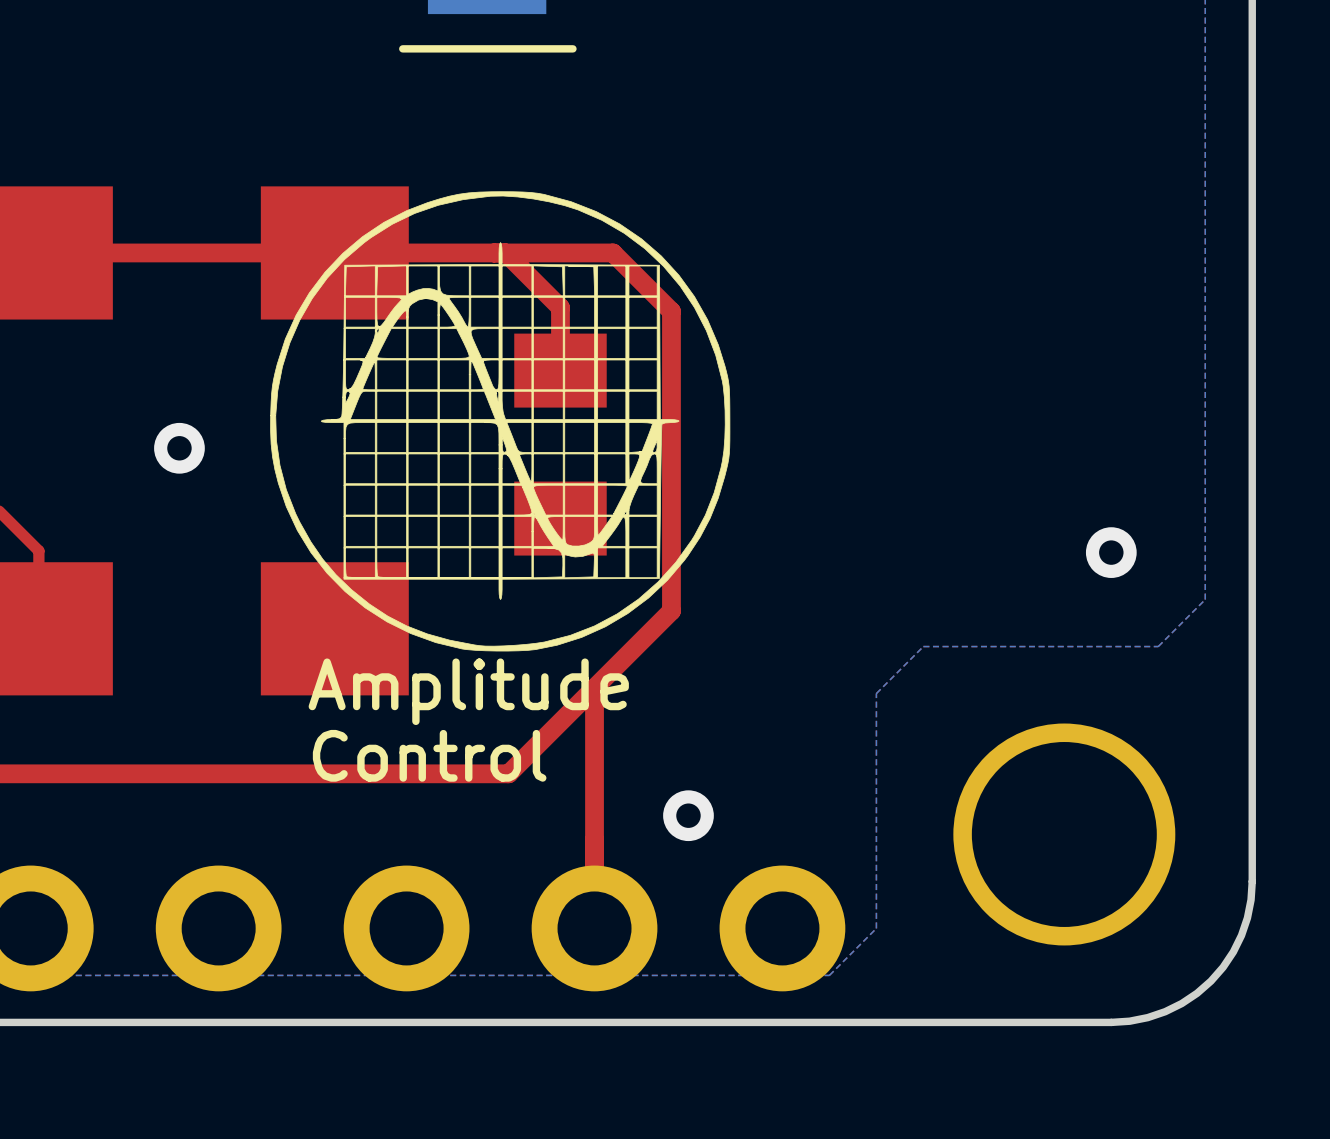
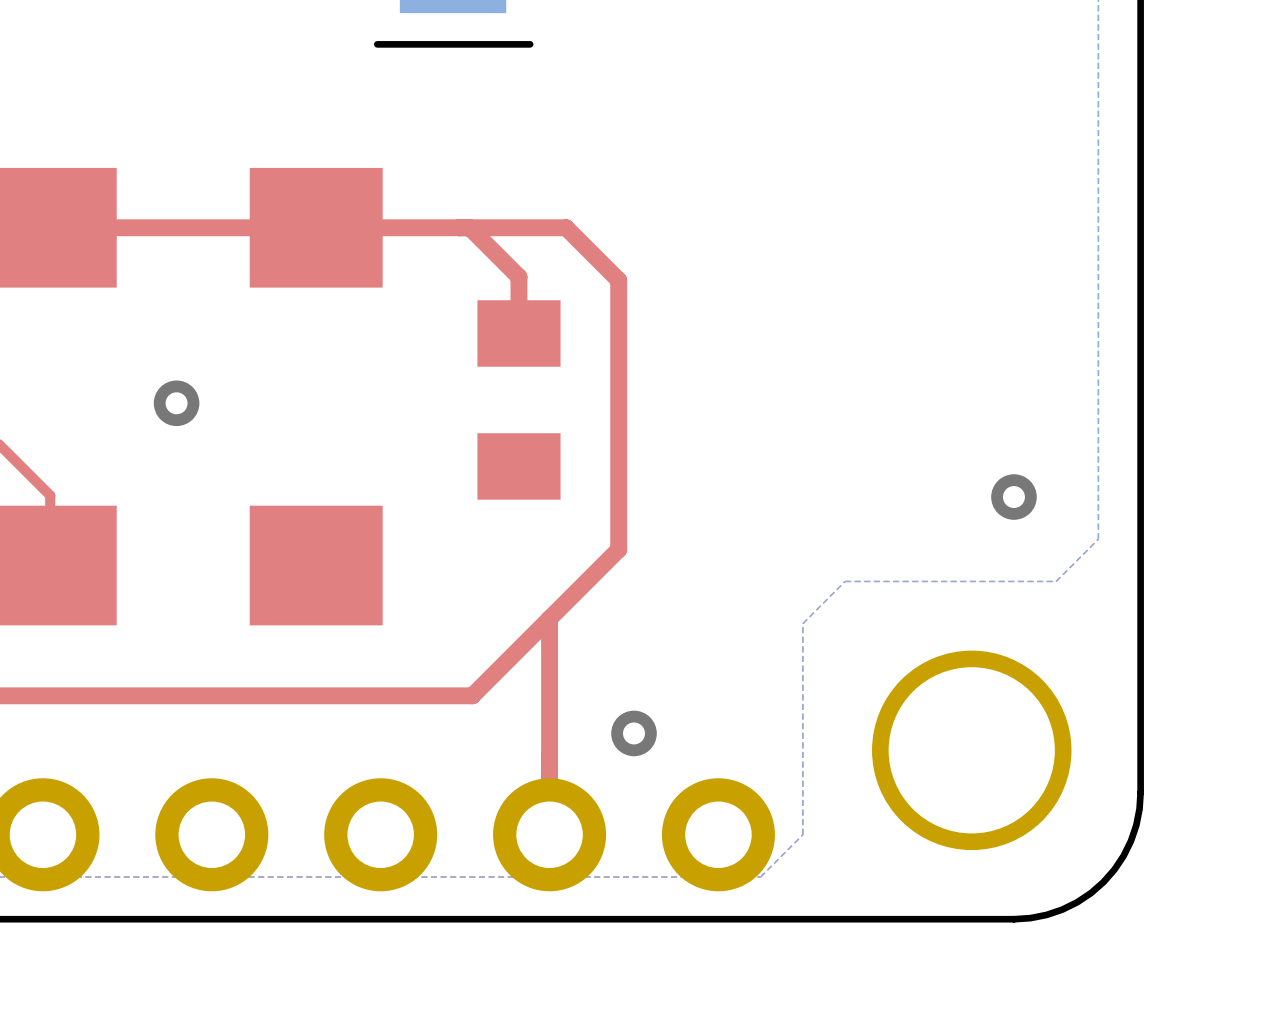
drawing: [270, 191, 731, 652] -> none
text: Amplitude (468, 691) -> none
text: Control (429, 755) -> none

